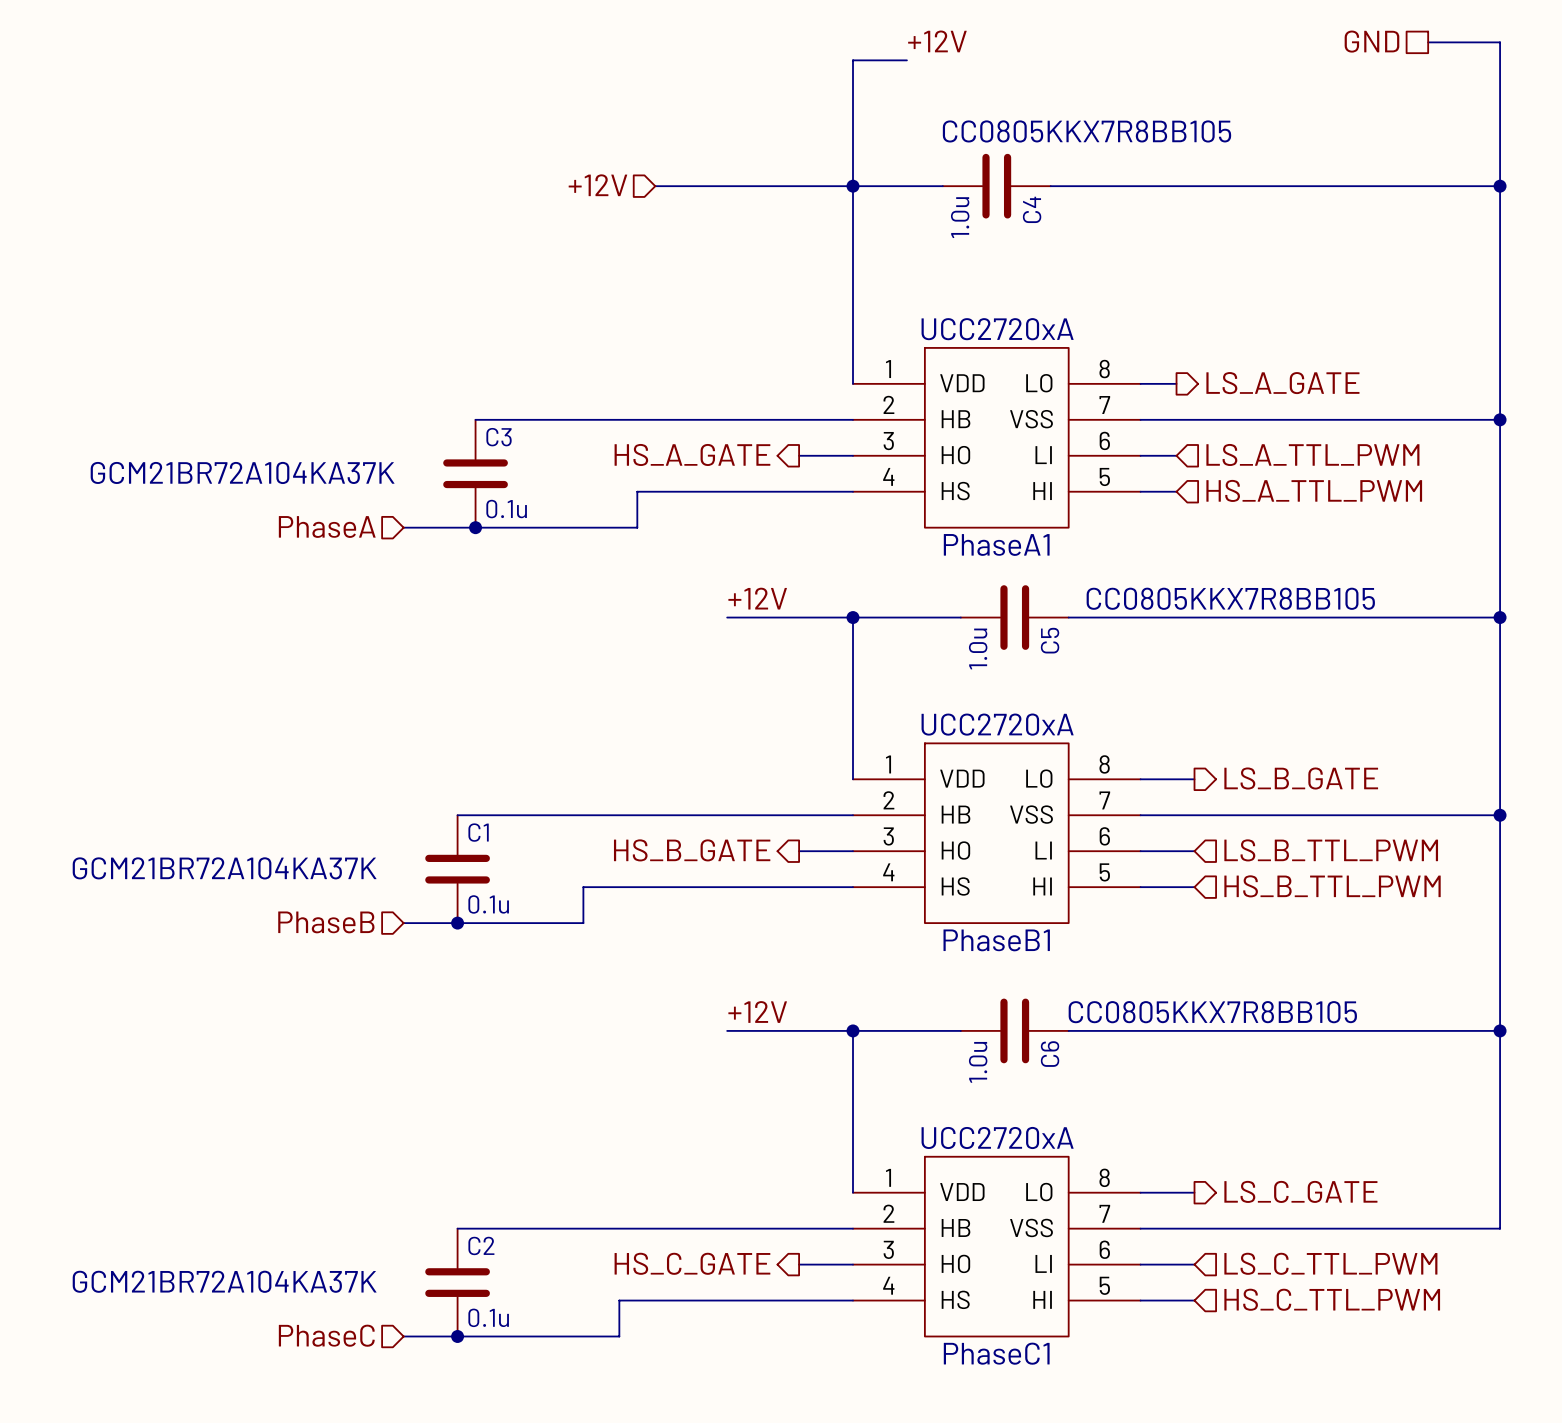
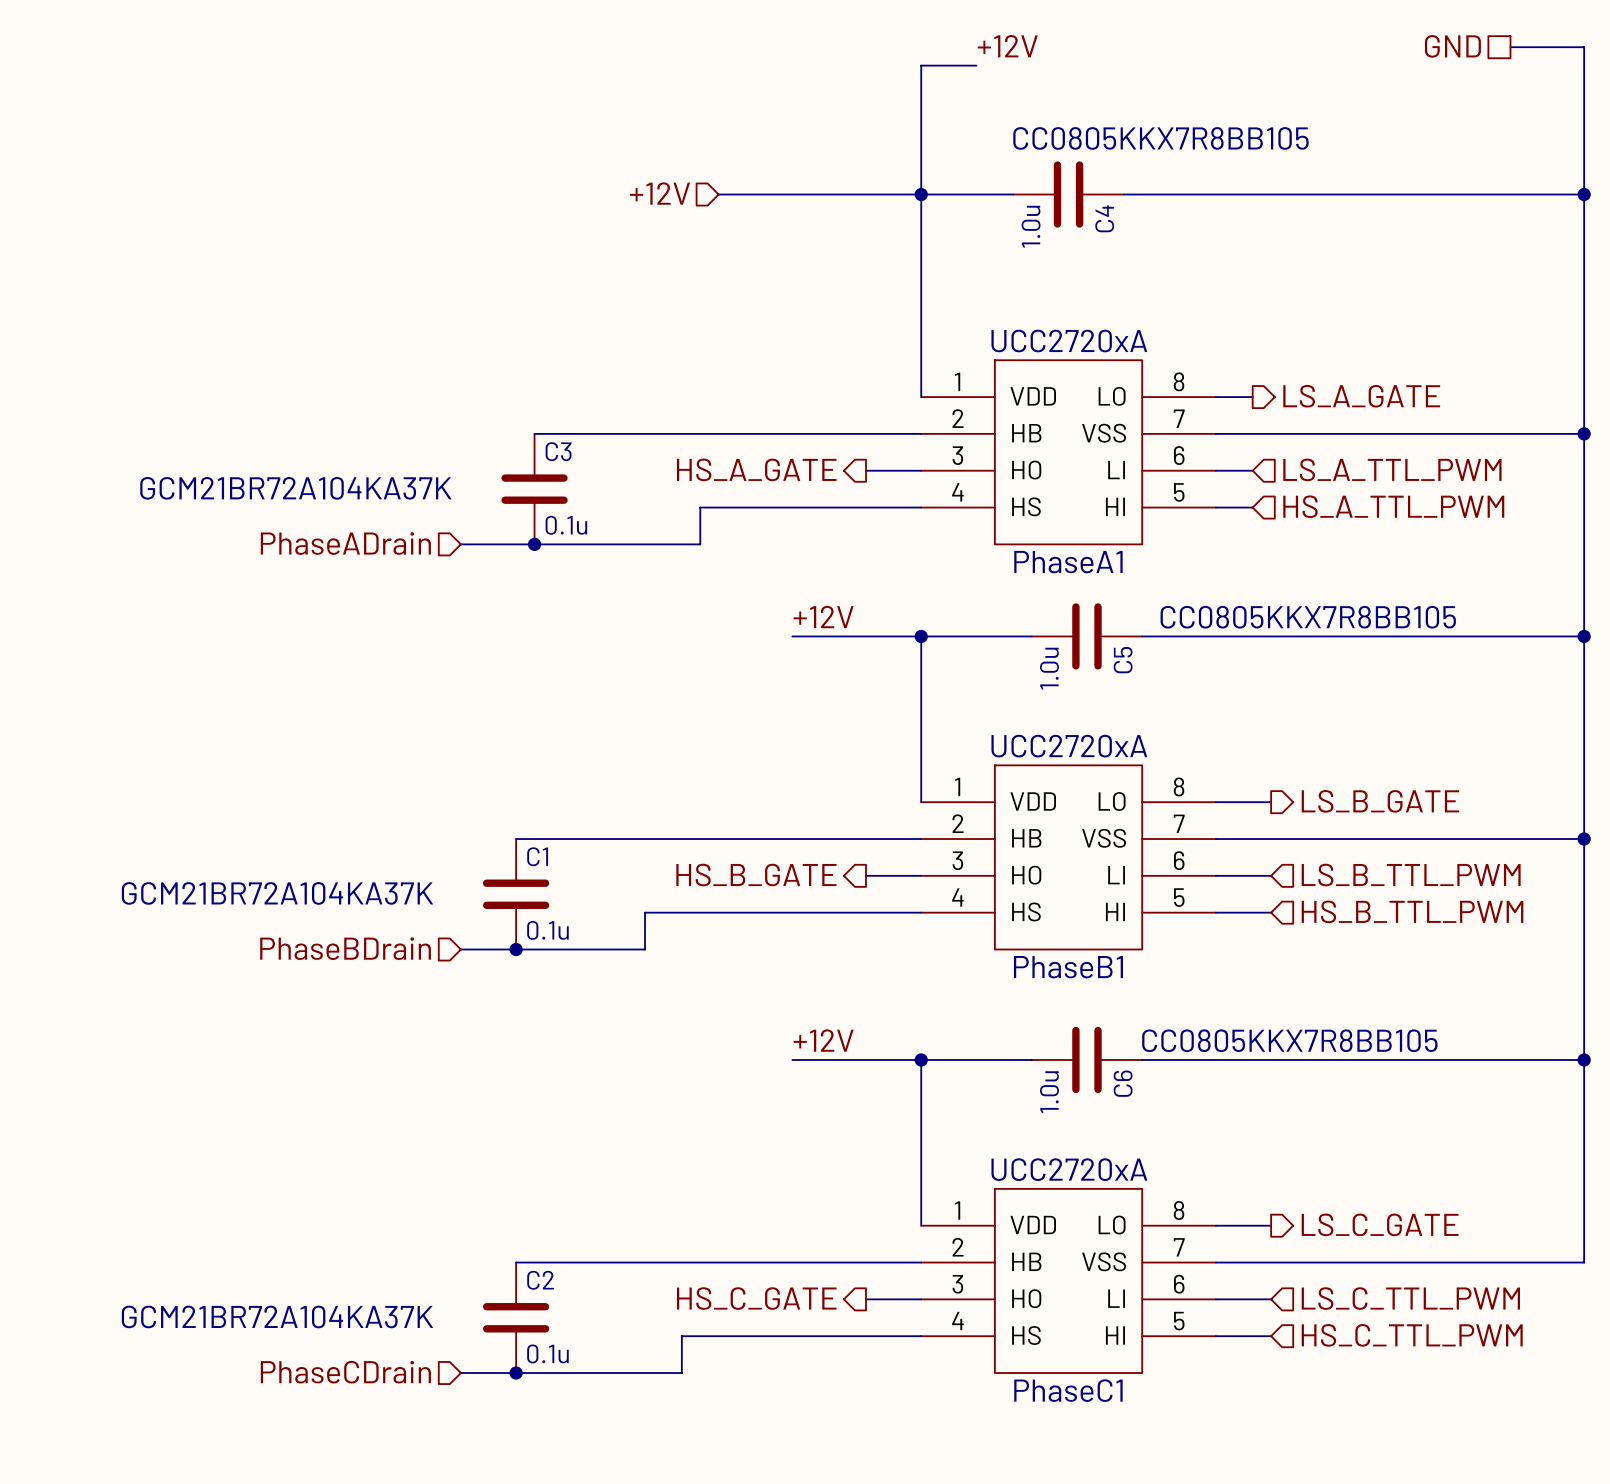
hierarchical label: PhaseA (327, 526) -> PhaseADrain (345, 543)
hierarchical label: PhaseB (326, 922) -> PhaseBDrain (345, 948)
hierarchical label: PhaseC (326, 1335) -> PhaseCDrain (345, 1372)

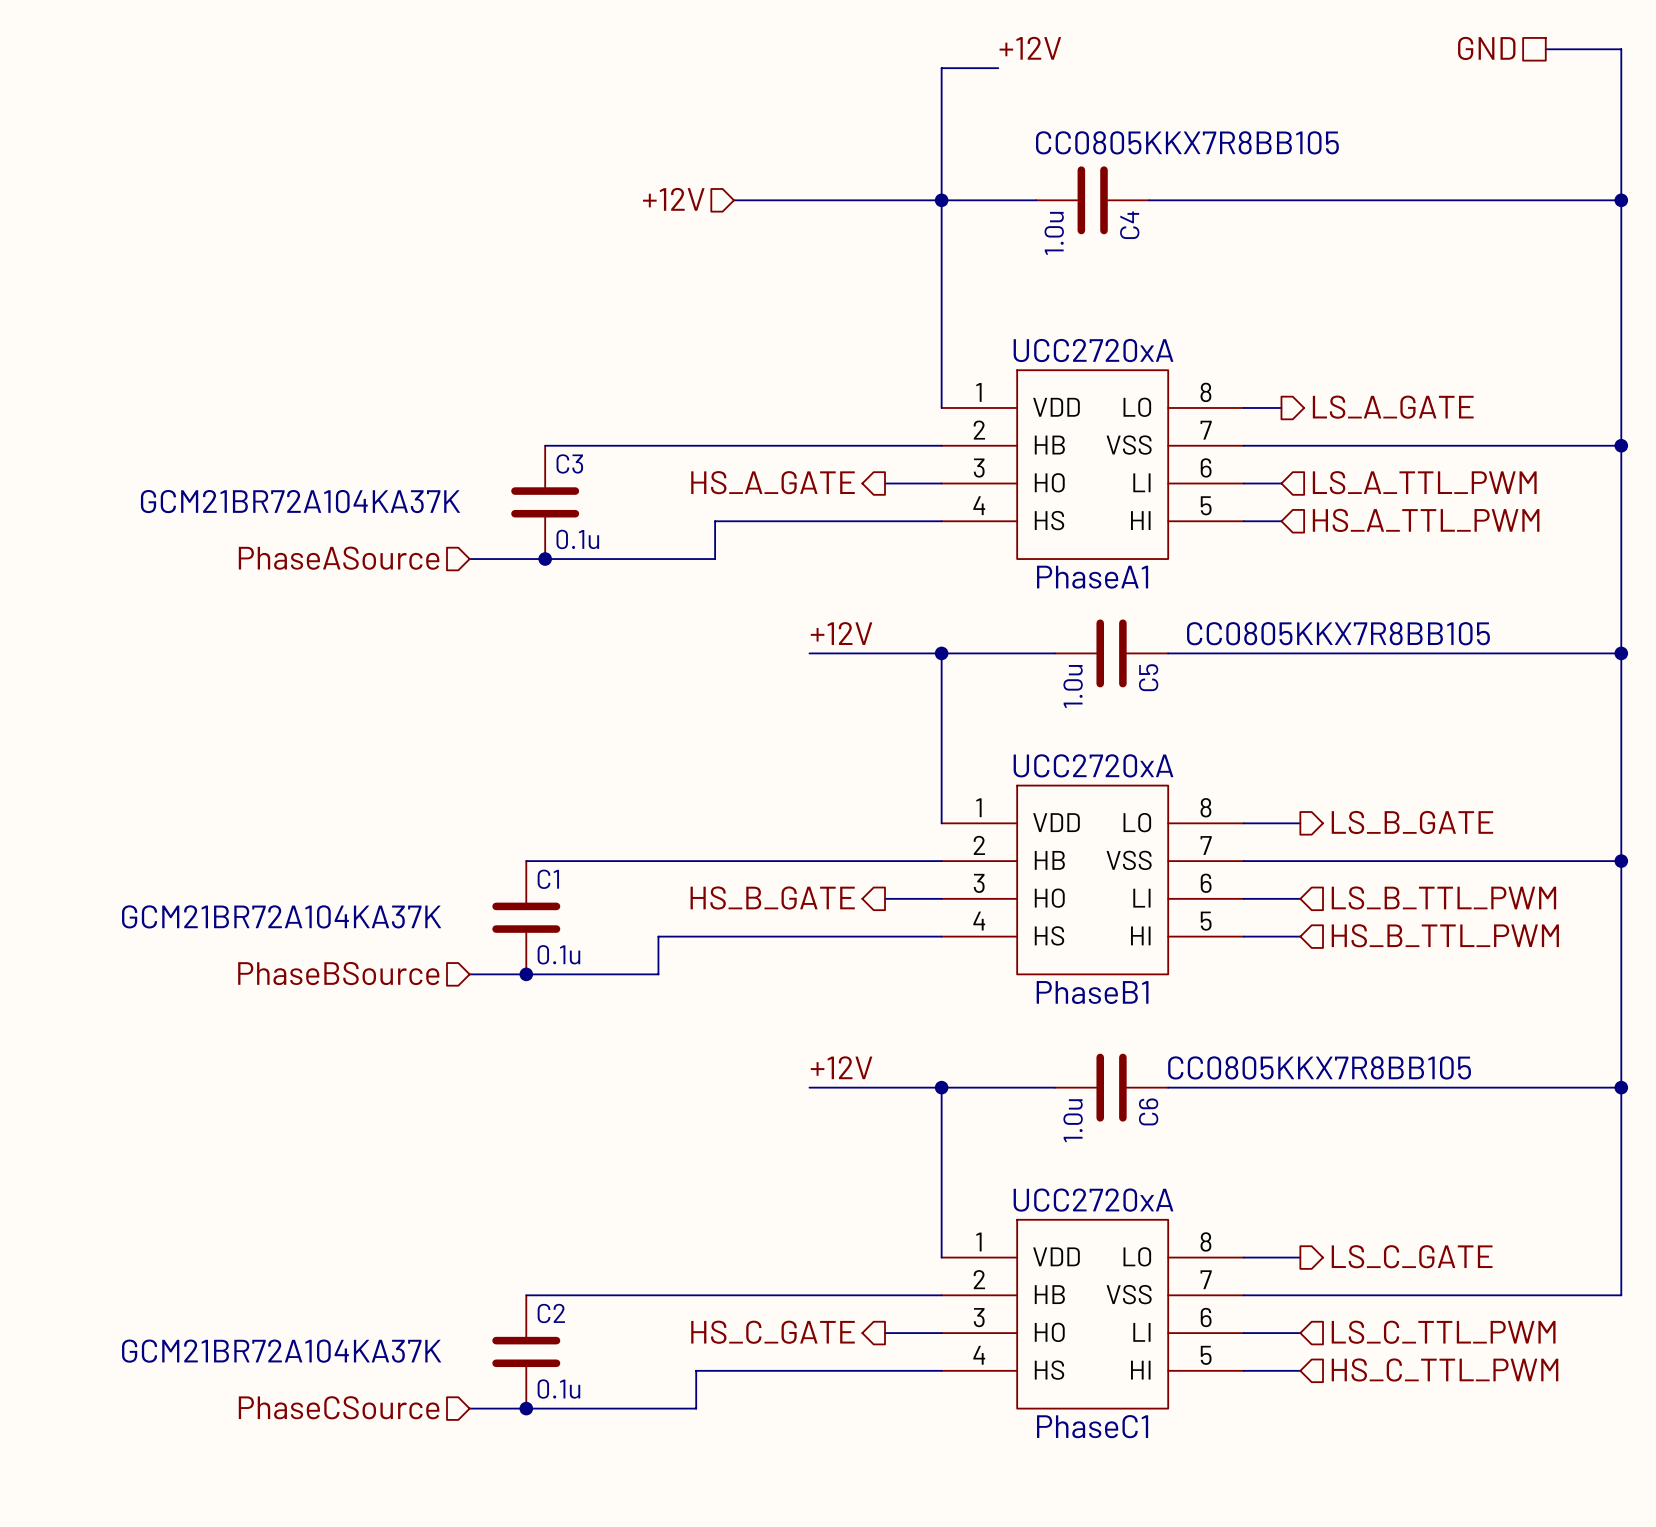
hierarchical label: PhaseADrain (345, 543) -> PhaseASource (339, 558)
hierarchical label: PhaseBDrain (345, 948) -> PhaseBSource (338, 973)
hierarchical label: PhaseCDrain (345, 1372) -> PhaseCSource (339, 1407)

